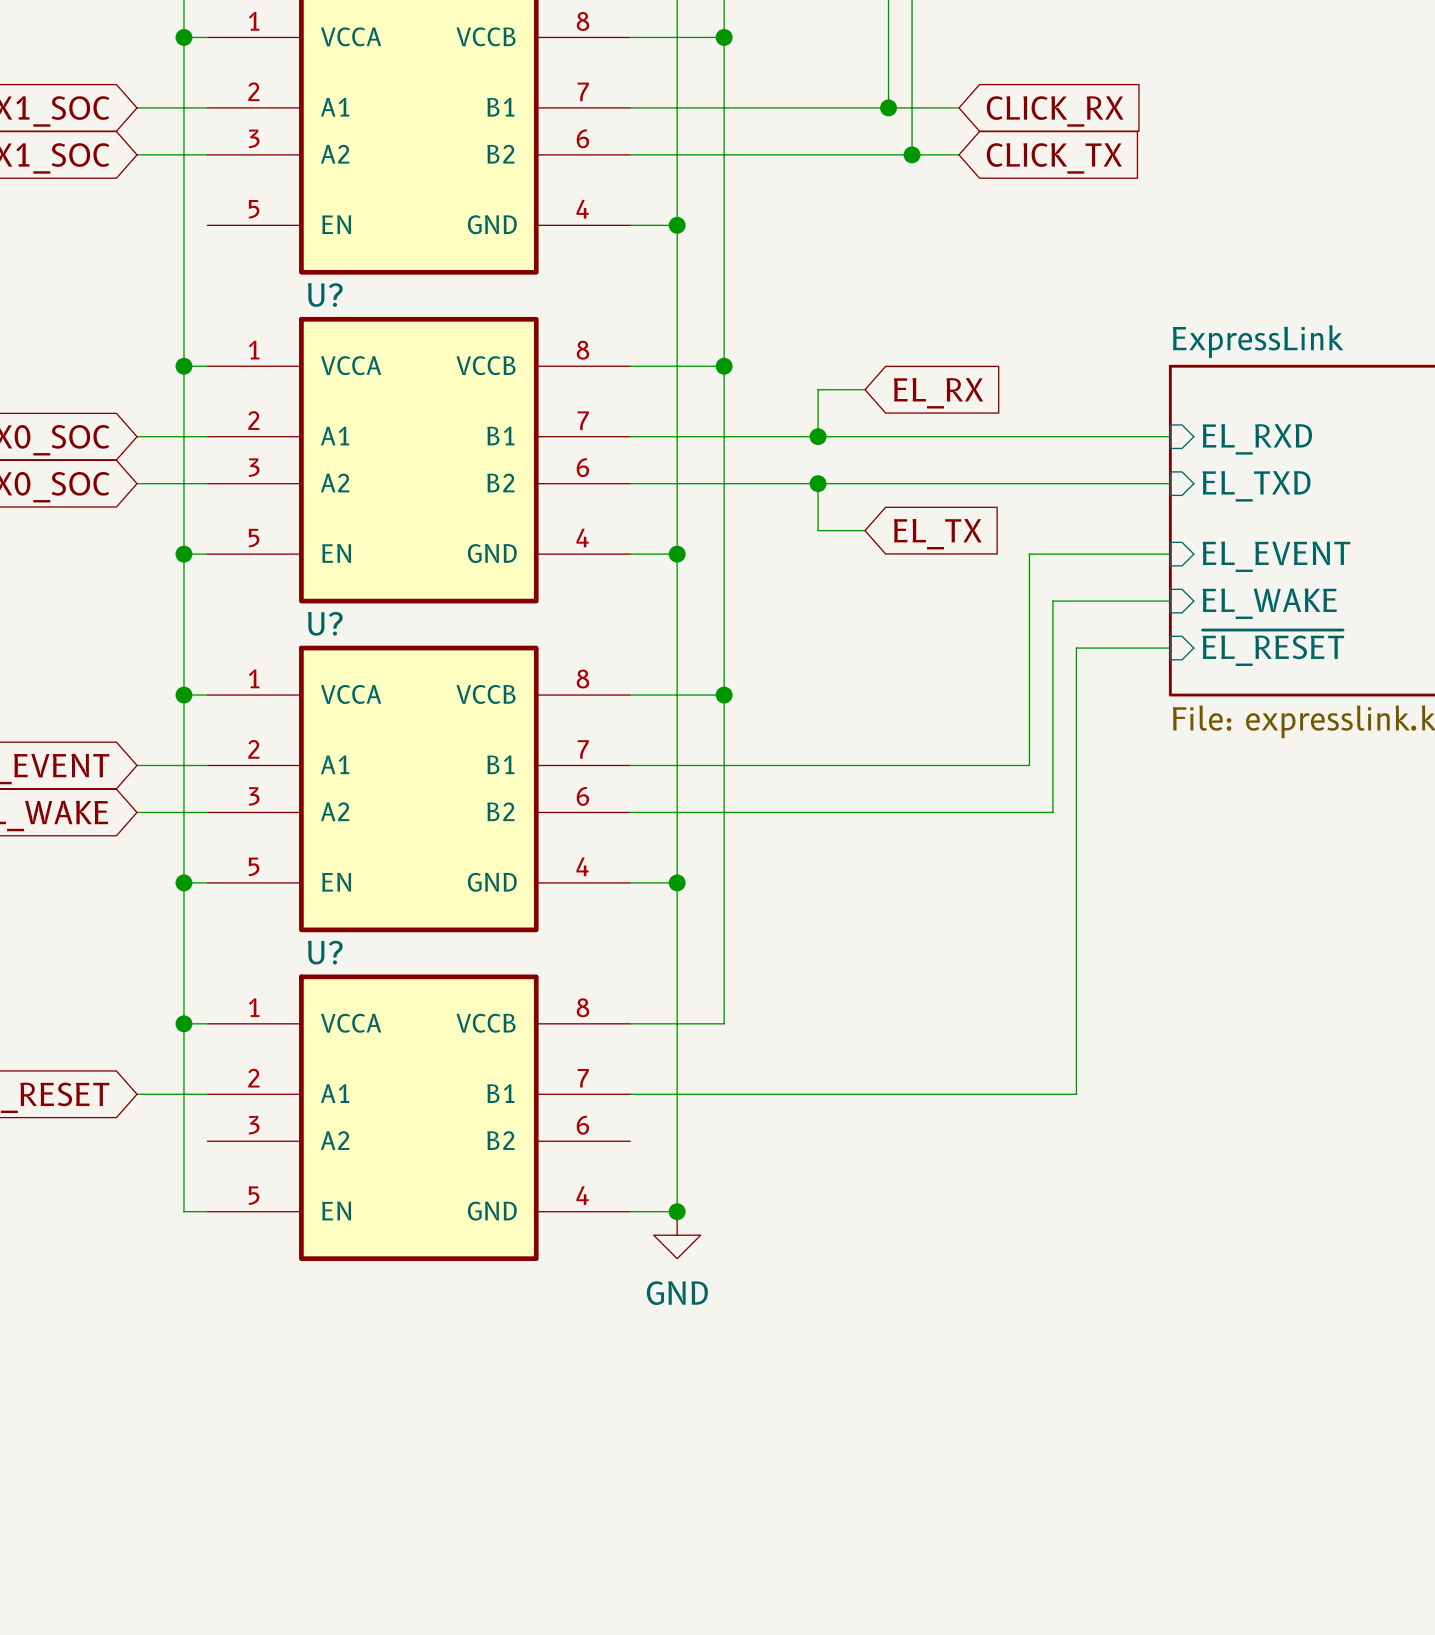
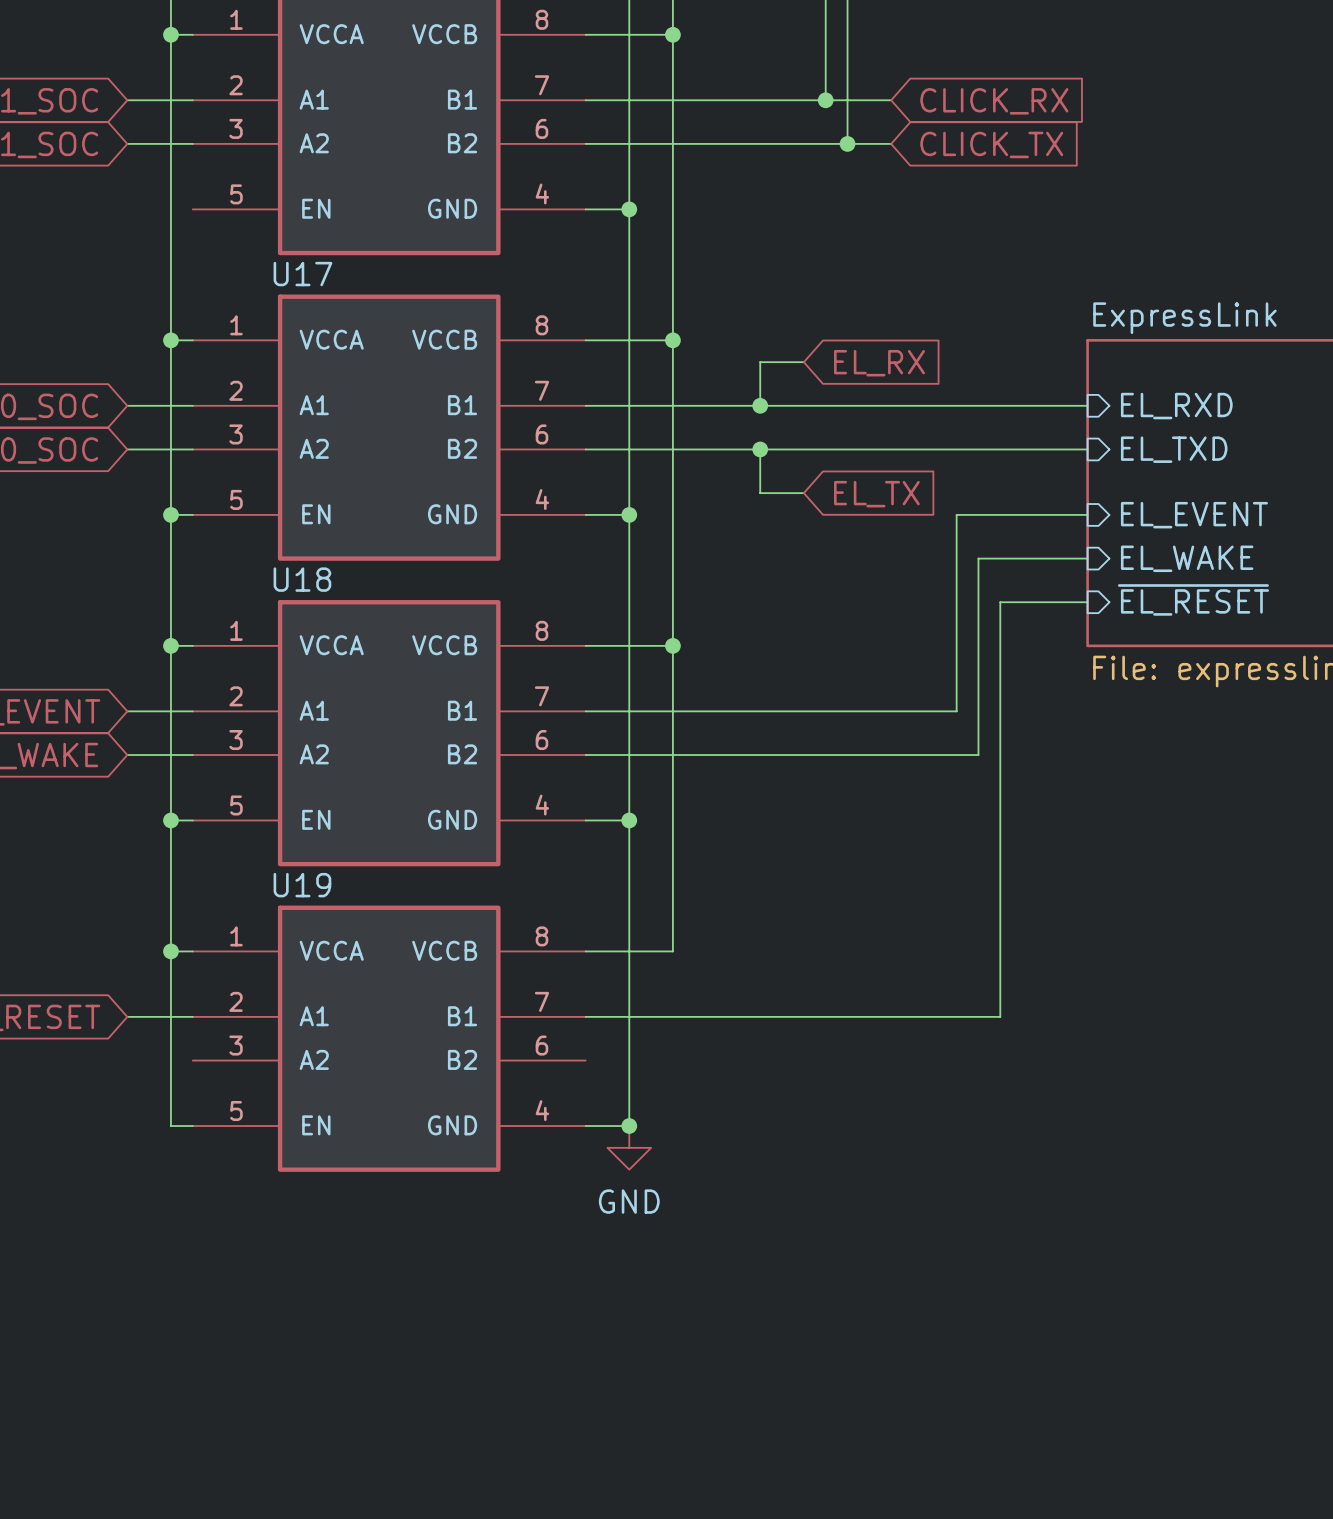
U? name: U? (325, 295) -> U17 (302, 274)
U? name: U? (325, 623) -> U18 (302, 579)
U? name: U? (325, 952) -> U19 (302, 885)

